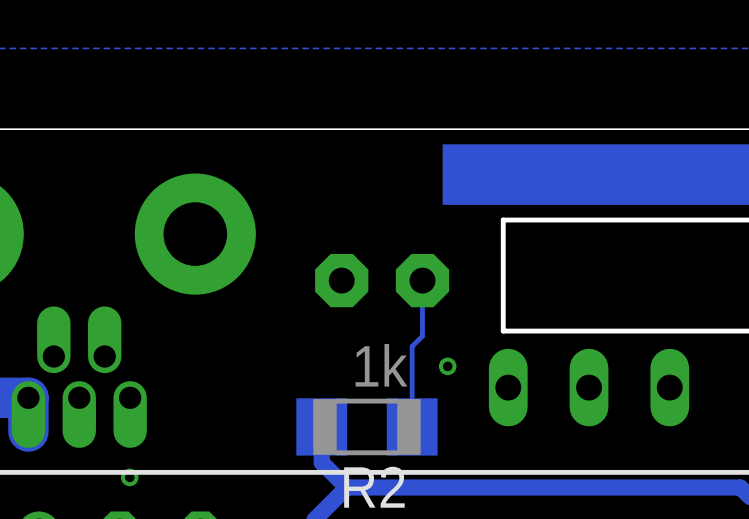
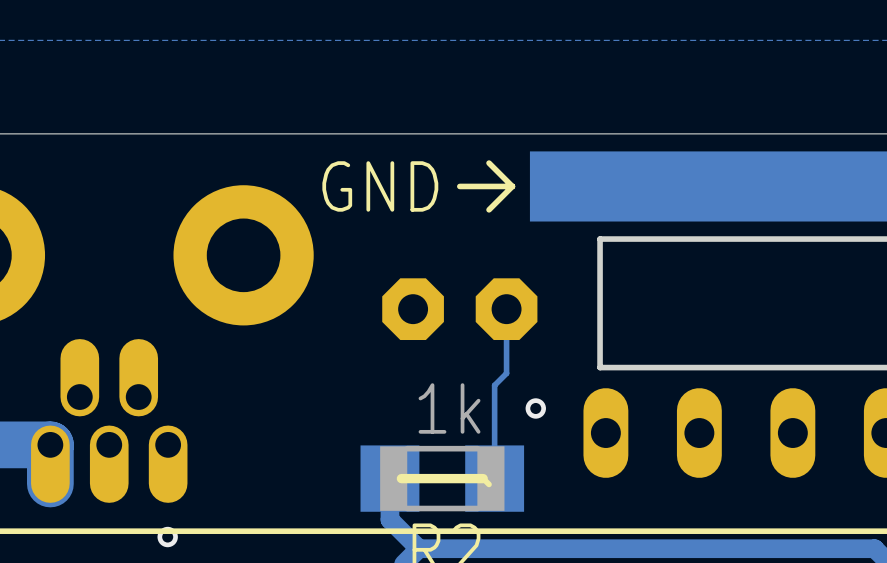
line: none -> (489, 163) (512, 186)
text: none -> GND (380, 186)
line: none -> (512, 186) (459, 186)
line: none -> (512, 186) (489, 209)
line: none -> (401, 478) (483, 478) (489, 484)

